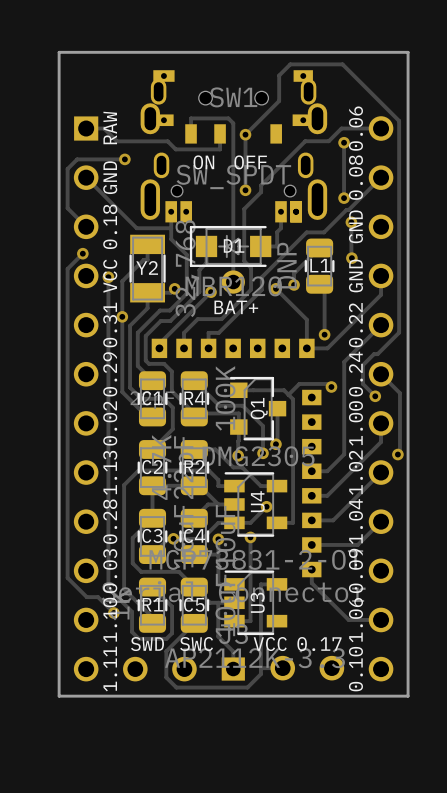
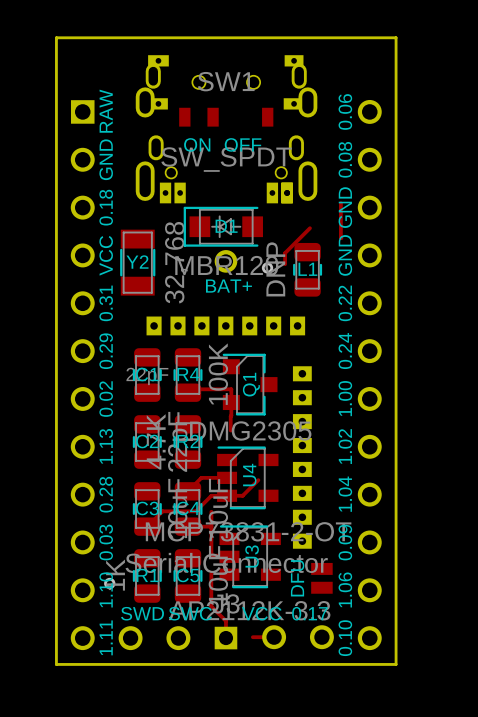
track: (86, 128) (104, 128) (116, 141) (167, 141) (175, 149) (220, 149) (220, 133) -> none
track: (381, 128) (341, 128) (328, 141) (305, 141) (261, 185) (261, 192) (244, 209) (244, 261) (251, 267) (251, 289) (221, 319) (197, 319) (184, 332) (184, 348) -> none
track: (191, 133) (191, 118) (228, 118) (233, 123) (233, 282) -> none
via: (245, 134) -> none
track: (344, 142) (344, 198) -> none
via: (344, 142) -> none
track: (124, 159) (77, 159) (67, 168) (67, 208) (86, 226) -> none
via: (124, 159) -> none
track: (86, 177) (136, 228) (171, 228) -> none
track: (381, 177) (324, 232) (306, 232) (261, 277) (261, 289) (218, 332) (208, 332) (208, 348) -> none
track: (245, 190) (245, 134) (279, 101) (279, 75) (290, 64) (342, 64) (399, 120) (399, 332) (377, 354) (373, 354) (362, 365) (362, 383) (375, 396) -> none
via: (245, 190) -> none
via: (344, 198) -> none
track: (171, 211) (171, 239) (186, 254) (186, 293) (169, 310) (160, 310) (137, 332) (137, 365) (152, 380) -> none
track: (281, 211) (281, 228) (277, 232) (277, 246) (260, 246) -> none
via: (351, 222) -> none
track: (147, 244) (147, 259) (143, 259) (122, 281) (122, 392) (147, 416) (152, 416) -> none
track: (206, 246) (206, 262) (199, 270) (199, 291) (170, 321) (160, 321) (145, 336) (145, 360) (148, 363) (164, 363) (171, 371) (171, 391) (194, 413) (194, 416) -> none
track: (82, 253) (67, 268) (67, 577) (86, 597) (98, 597) (113, 612) -> none
via: (82, 253) -> none
via: (351, 258) -> none
L1 position: (319, 266) -> (307, 269)
Y2 position: (147, 268) -> (137, 262)
track: (381, 275) (381, 294) (327, 348) (306, 348) (306, 319) (275, 288) -> none
track: (108, 277) (108, 588) (132, 611) (132, 632) (138, 638) (166, 638) (172, 633) (172, 606) (152, 587) -> none
via: (108, 277) -> none
via: (294, 284) -> none
track: (319, 284) (324, 289) (324, 334) -> none
track: (174, 288) (170, 292) (147, 292) (147, 308) (130, 325) (130, 387) (141, 398) (164, 398) (172, 407) (172, 429) (152, 449) -> none
via: (174, 288) -> none
track: (211, 292) (159, 343) (159, 348) -> none
via: (211, 292) -> none
via: (122, 316) -> none
track: (381, 325) (344, 361) (344, 454) (327, 471) (311, 471) -> none
via: (324, 334) -> none
track: (381, 374) (399, 393) (399, 452) (397, 454) -> none
track: (194, 380) (219, 405) (242, 405) (263, 426) (263, 453) -> none
track: (331, 386) (328, 383) (299, 383) (288, 394) -> none
via: (331, 386) -> none
track: (238, 390) (284, 390) (288, 394) -> none
track: (288, 394) (293, 399) (293, 522) (277, 522) -> none
via: (375, 396) -> none
track: (277, 408) (275, 444) -> none
track: (381, 423) (381, 442) (327, 495) (311, 495) -> none
via: (275, 444) -> none
track: (194, 449) (215, 449) (233, 467) (242, 467) (260, 486) (277, 486) -> none
via: (263, 453) -> none
via: (397, 454) -> none
via: (238, 455) -> none
track: (381, 472) (333, 520) (311, 520) -> none
track: (234, 486) (218, 486) (218, 480) (208, 470) (138, 470) (124, 485) (124, 589) (152, 617) (152, 623) -> none
track: (218, 504) (199, 485) (152, 485) (152, 518) (132, 538) (132, 563) (141, 571) (179, 571) (209, 602) (234, 602) -> none
via: (266, 506) -> none
track: (381, 521) (357, 544) (311, 544) -> none
track: (250, 537) (250, 621) (234, 621) -> none
via: (250, 537) -> none
via: (173, 538) -> none
via: (218, 539) -> none
track: (311, 569) (311, 583) (348, 619) (381, 619) -> none
track: (277, 584) (260, 584) (260, 674) (247, 687) (176, 687) (166, 677) (166, 651) (194, 623) -> none
U3 position: (255, 602) -> (250, 556)
part: none -> (321, 578)

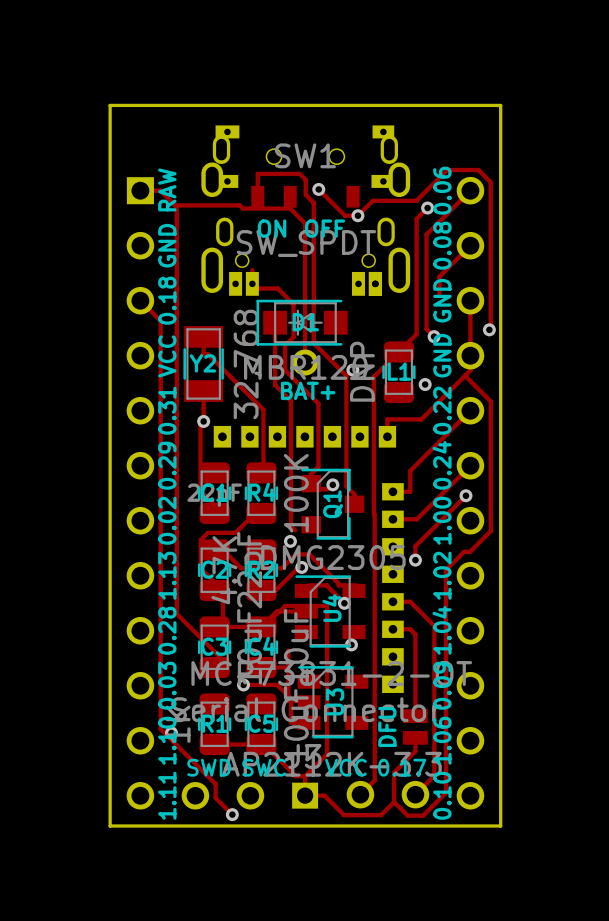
track: none -> (318, 189) (345, 215) (357, 215) (372, 200) (416, 200) (447, 170) (478, 170) (490, 182) (489, 329)
via: none -> (318, 189)
track: none -> (140, 190) (160, 190) (175, 205) (239, 205) (242, 208) (290, 208)
track: none -> (470, 190) (426, 234) (426, 329) (434, 336)
track: none -> (257, 191) (257, 173) (299, 173) (305, 179) (305, 194) (313, 202) (313, 343) (346, 375) (346, 486) (354, 494) (354, 509)
track: none -> (176, 205) (176, 613) (226, 663)
track: none -> (290, 208) (305, 223) (305, 362)
via: none -> (427, 208)
via: none -> (357, 215)
track: none -> (470, 245) (439, 276) (439, 295)
track: none -> (252, 270) (252, 288) (277, 288) (293, 304) (293, 337) (285, 345) (285, 370) (318, 403) (318, 466) (311, 473) (311, 489) (327, 489) (332, 484)
track: (340, 203) (341, 238) -> none
track: none -> (140, 300) (160, 320) (160, 729) (215, 784) (215, 797) (232, 814)
track: none -> (470, 300) (470, 370) (421, 419) (387, 419) (387, 436)
track: none -> (275, 319) (275, 385) (290, 400) (290, 526) (295, 530)
track: (309, 228) (285, 253) (285, 264) -> none
via: none -> (489, 329)
via: none -> (434, 336)
track: none -> (203, 336) (203, 354) (207, 354) (263, 409) (264, 472)
track: none -> (465, 375) (490, 401) (490, 531) (470, 551) (464, 551) (445, 570) (445, 792) (423, 815) (407, 815) (394, 802)
via: none -> (425, 384)
track: none -> (203, 391) (203, 421) (200, 424) (200, 491) (222, 513)
track: none -> (470, 410) (410, 470) (410, 491) (392, 491)
via: none -> (203, 421)
track: none -> (470, 465) (416, 519) (392, 519)
via: none -> (332, 484)
track: none -> (465, 495) (415, 546) (415, 560)
via: none -> (465, 495)
track: (187, 389) (231, 389) (230, 430) -> none
track: none -> (264, 513) (254, 513) (235, 532) (207, 532) (200, 539) (200, 568) (222, 590) (222, 626) (264, 626) (285, 605) (327, 605) (327, 754) (305, 776) (295, 776) (264, 744) (222, 744)
via: none -> (290, 541)
track: none -> (222, 549) (241, 568) (282, 568) (295, 554) (309, 554) (338, 585) (356, 585)
via: none -> (415, 560)
track: none -> (301, 567) (298, 567) (275, 590) (264, 590)
via: none -> (301, 567)
track: none -> (309, 585) (327, 585) (344, 603)
track: none -> (392, 601) (410, 601) (434, 625) (434, 775) (415, 794)
via: none -> (344, 603)
track: (258, 480) (242, 495) (211, 495) (195, 511) (162, 511) (147, 526) -> none
track: none -> (392, 629) (410, 629) (415, 634) (415, 716)
via: none -> (351, 644)
track: none -> (243, 684) (277, 684) (291, 698) (291, 722) (309, 722)
via: none -> (243, 684)
track: (211, 573) (211, 606) (225, 621) -> none
track: none -> (415, 737) (415, 751) (394, 772) (394, 802)
track: (252, 637) (274, 637) -> (427, 208) (416, 218) (416, 334) (373, 376) (374, 780) (360, 794)
track: none -> (305, 795) (324, 795) (344, 815) (381, 815) (394, 802)
via: none -> (232, 814)

